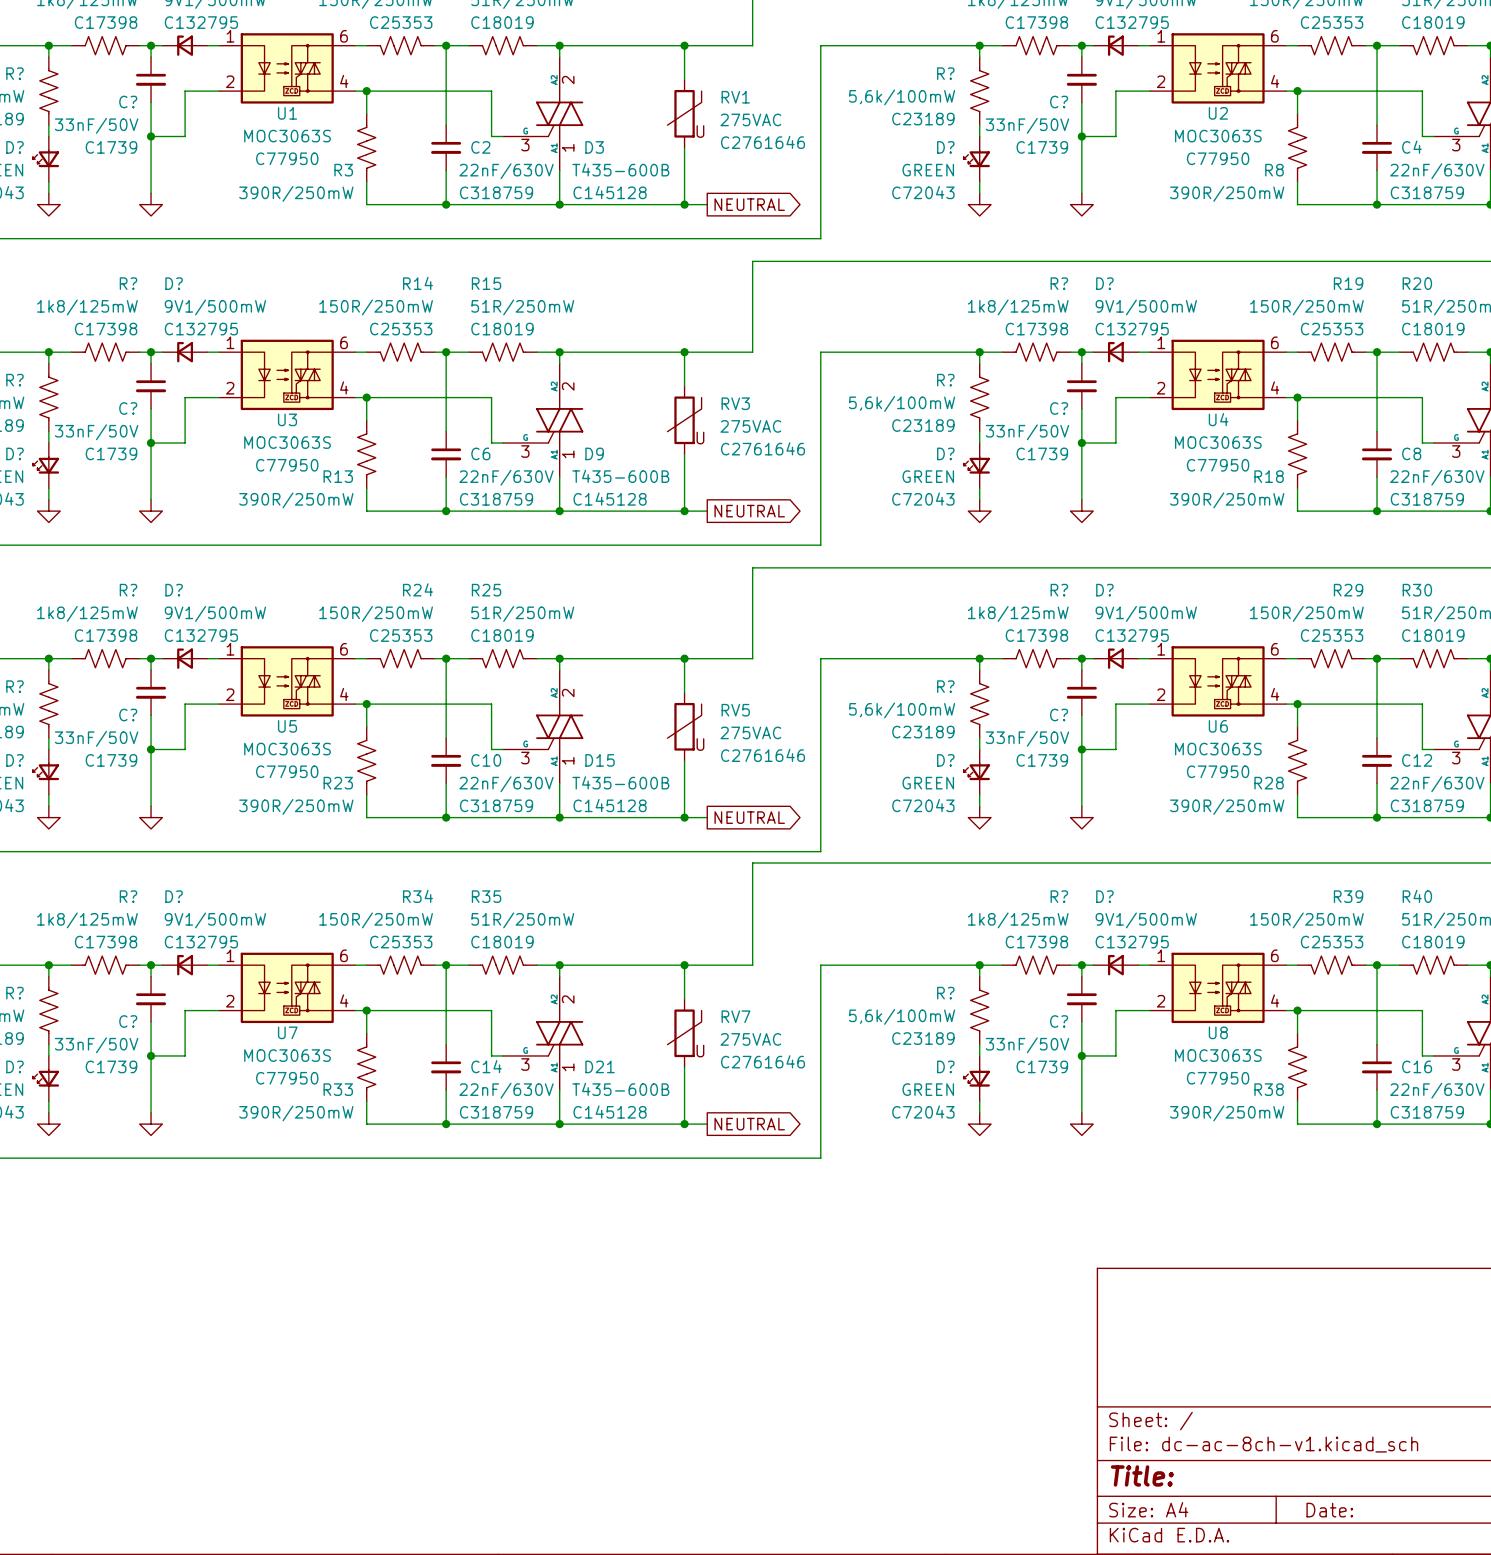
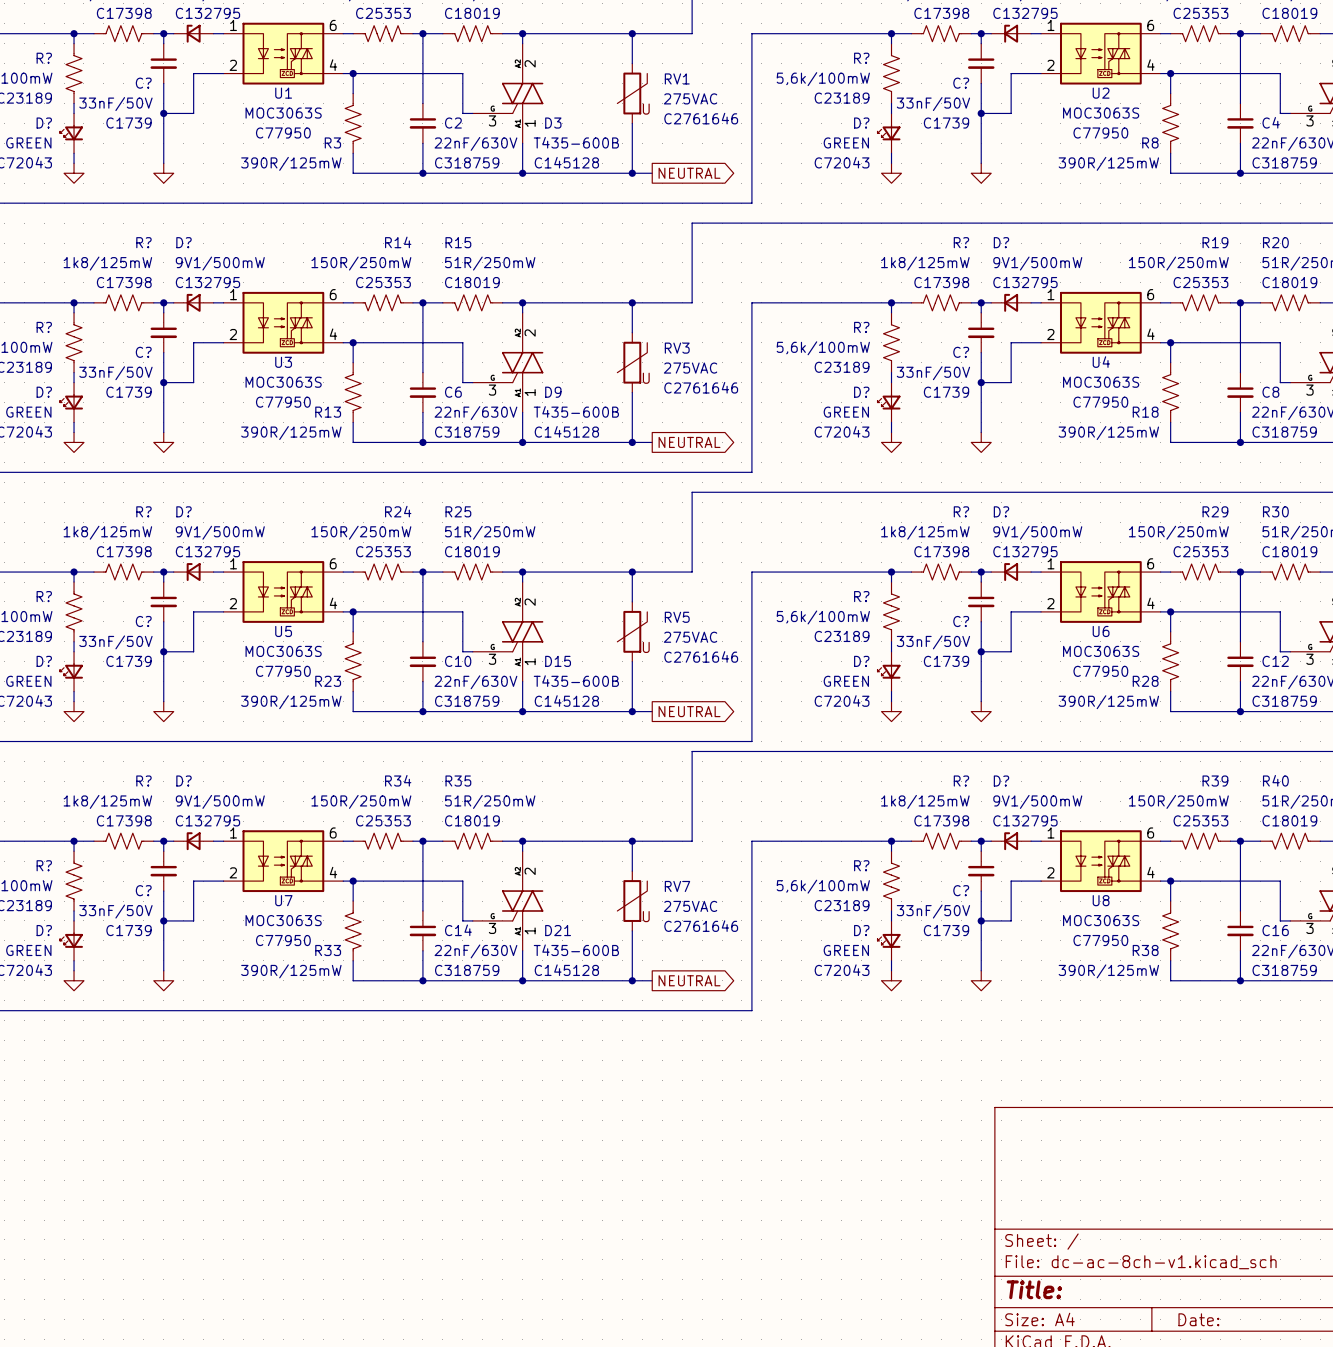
R3 value: 390R/250mW (296, 193) -> 390R/125mW (291, 163)
R8 value: 390R/250mW (1227, 193) -> 390R/125mW (1108, 163)
R13 value: 390R/250mW (296, 500) -> 390R/125mW (291, 433)
R18 value: 390R/250mW (1227, 500) -> 390R/125mW (1108, 433)
R23 value: 390R/250mW (296, 806) -> 390R/125mW (291, 702)
R28 value: 390R/250mW (1227, 806) -> 390R/125mW (1108, 702)
R33 value: 390R/250mW (296, 1113) -> 390R/125mW (291, 971)
R38 value: 390R/250mW (1227, 1113) -> 390R/125mW (1108, 971)

